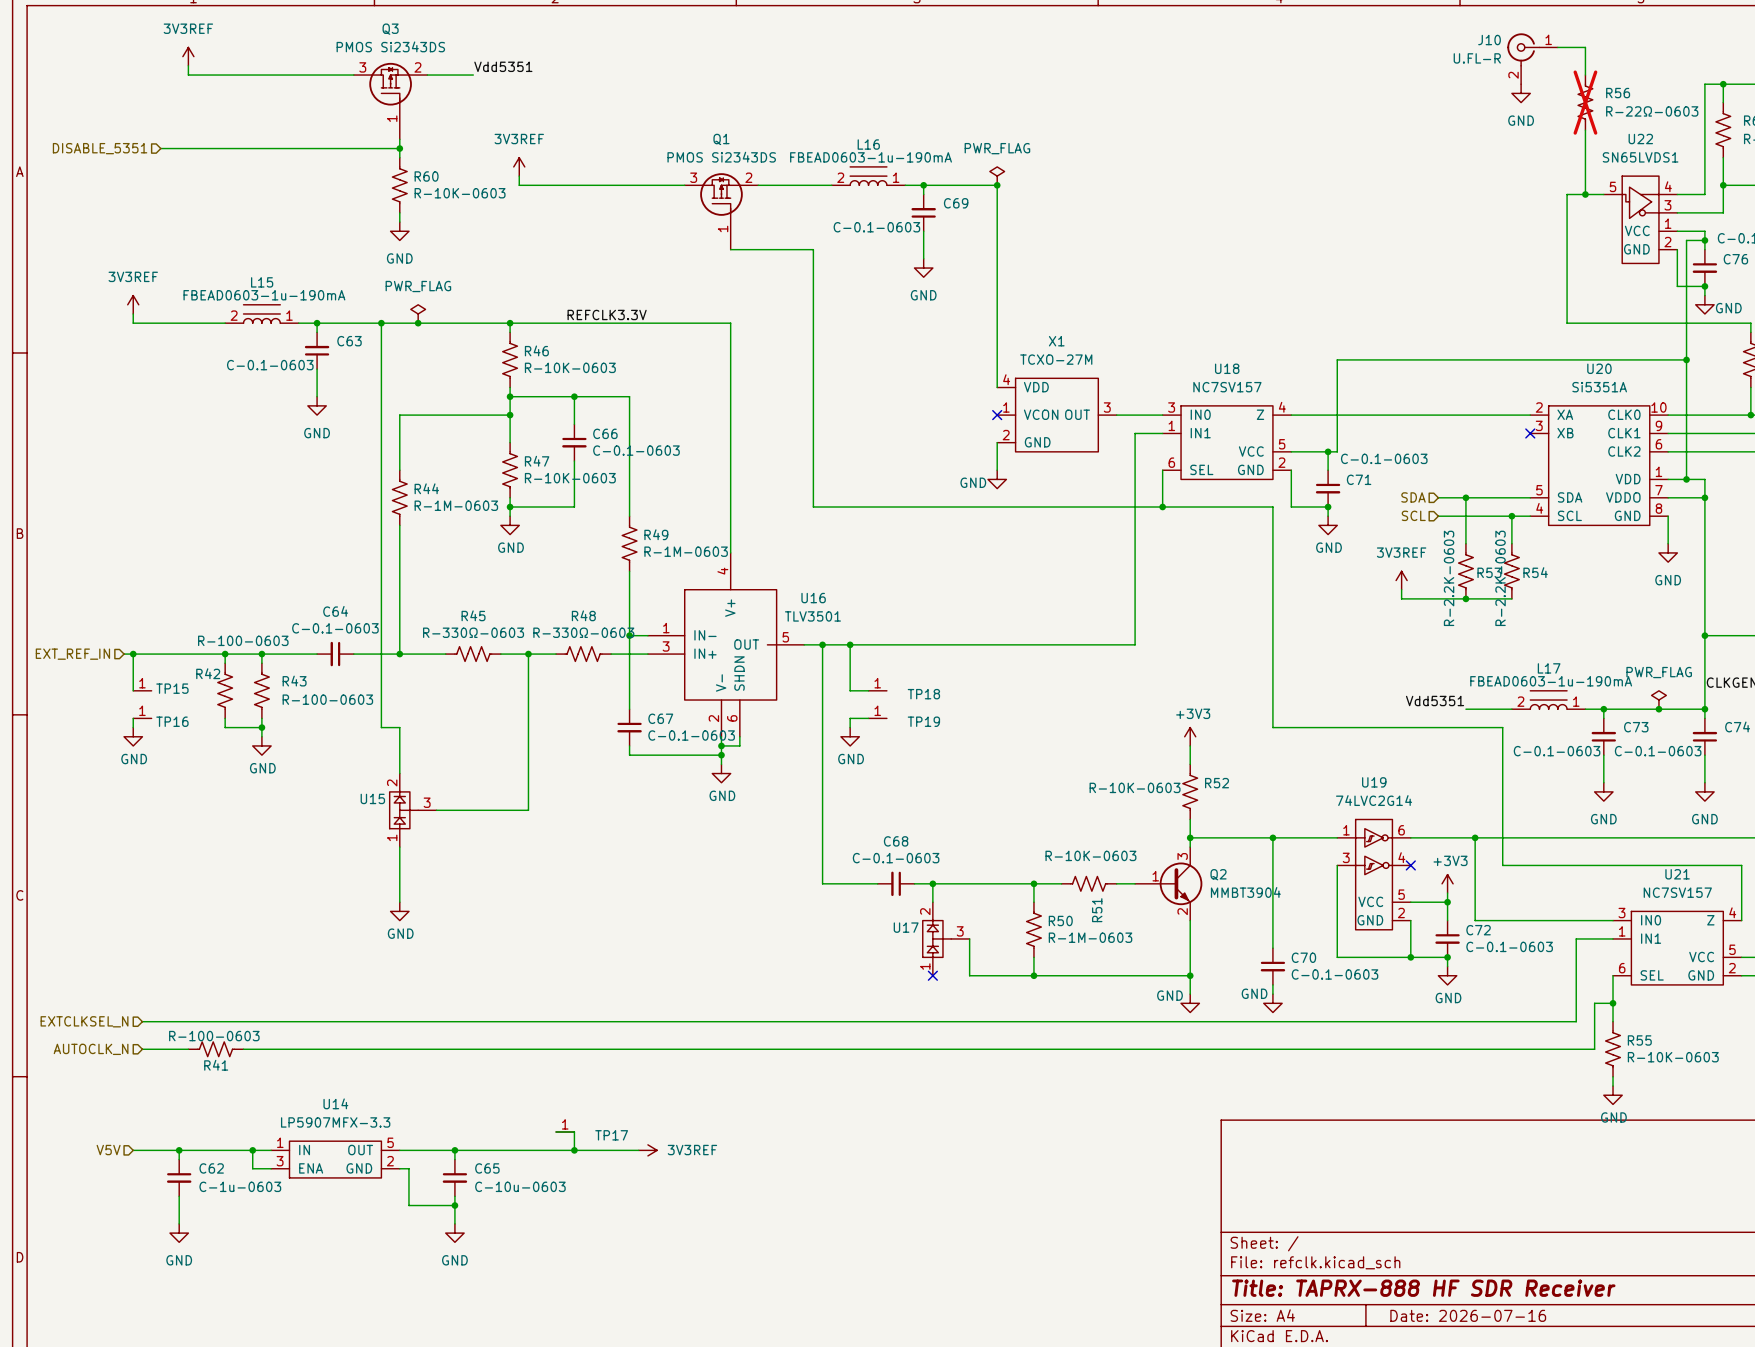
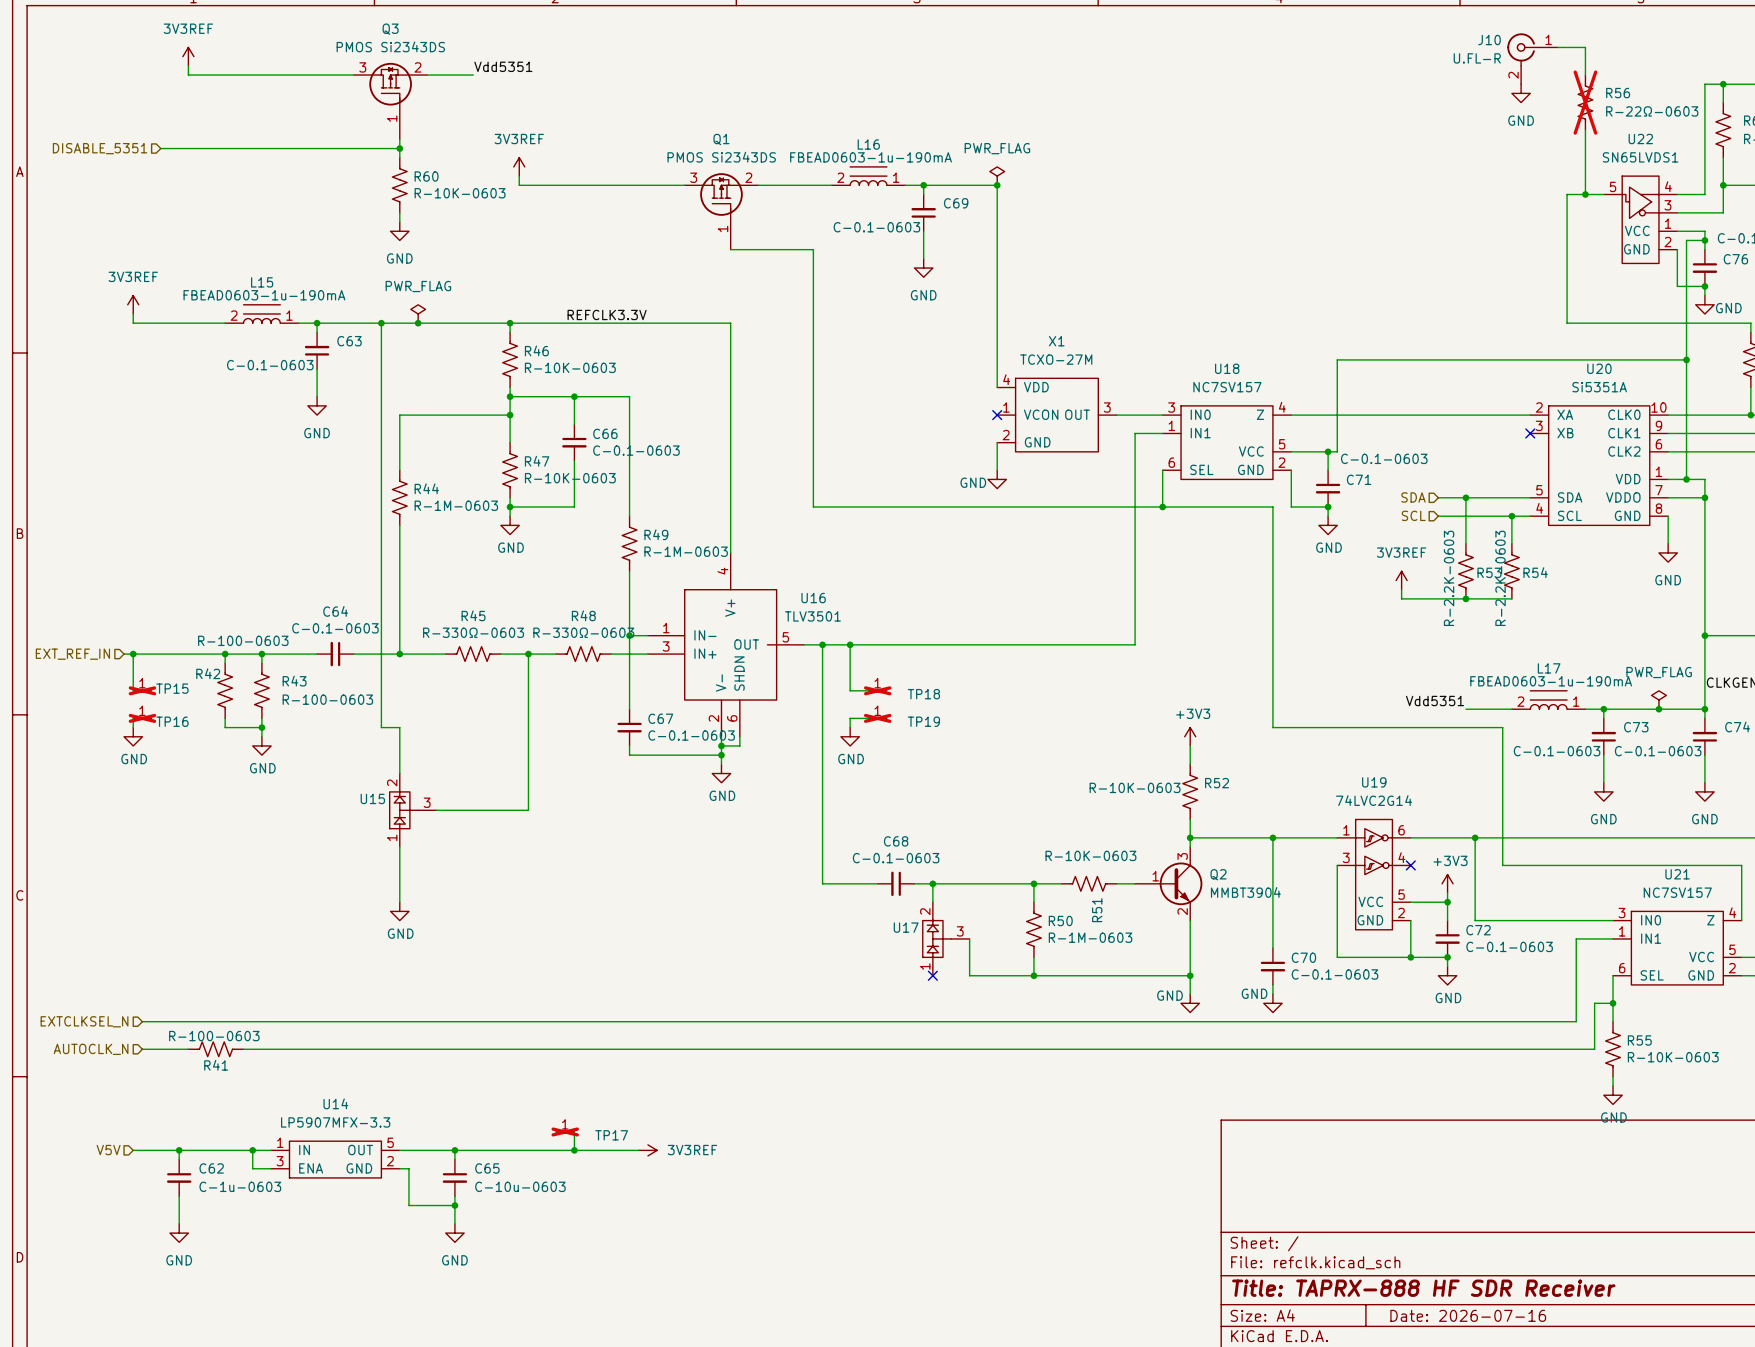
TP15 do-not-place cross: none -> (142, 690)
TP18 do-not-place cross: none -> (877, 690)
TP16 do-not-place cross: none -> (142, 718)
TP19 do-not-place cross: none -> (877, 718)
TP17 do-not-place cross: none -> (565, 1131)

